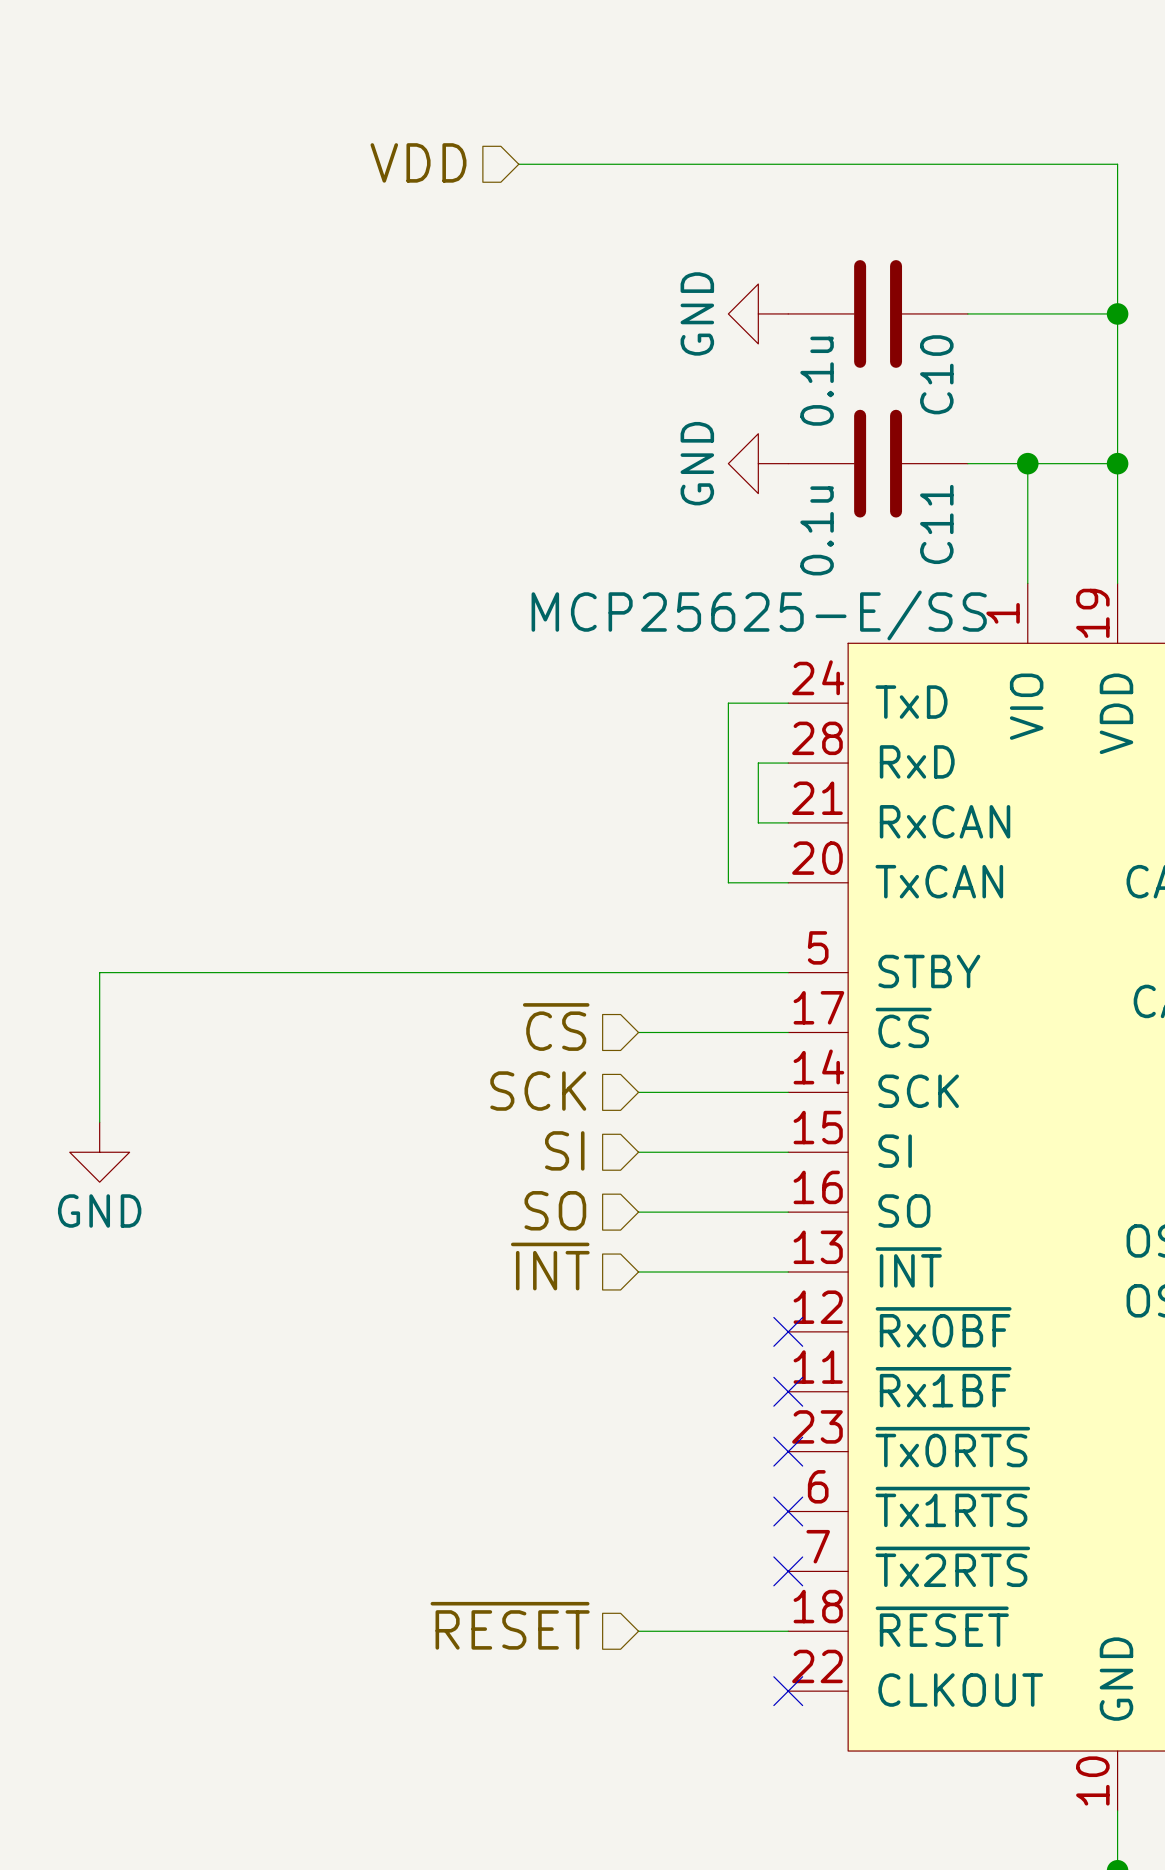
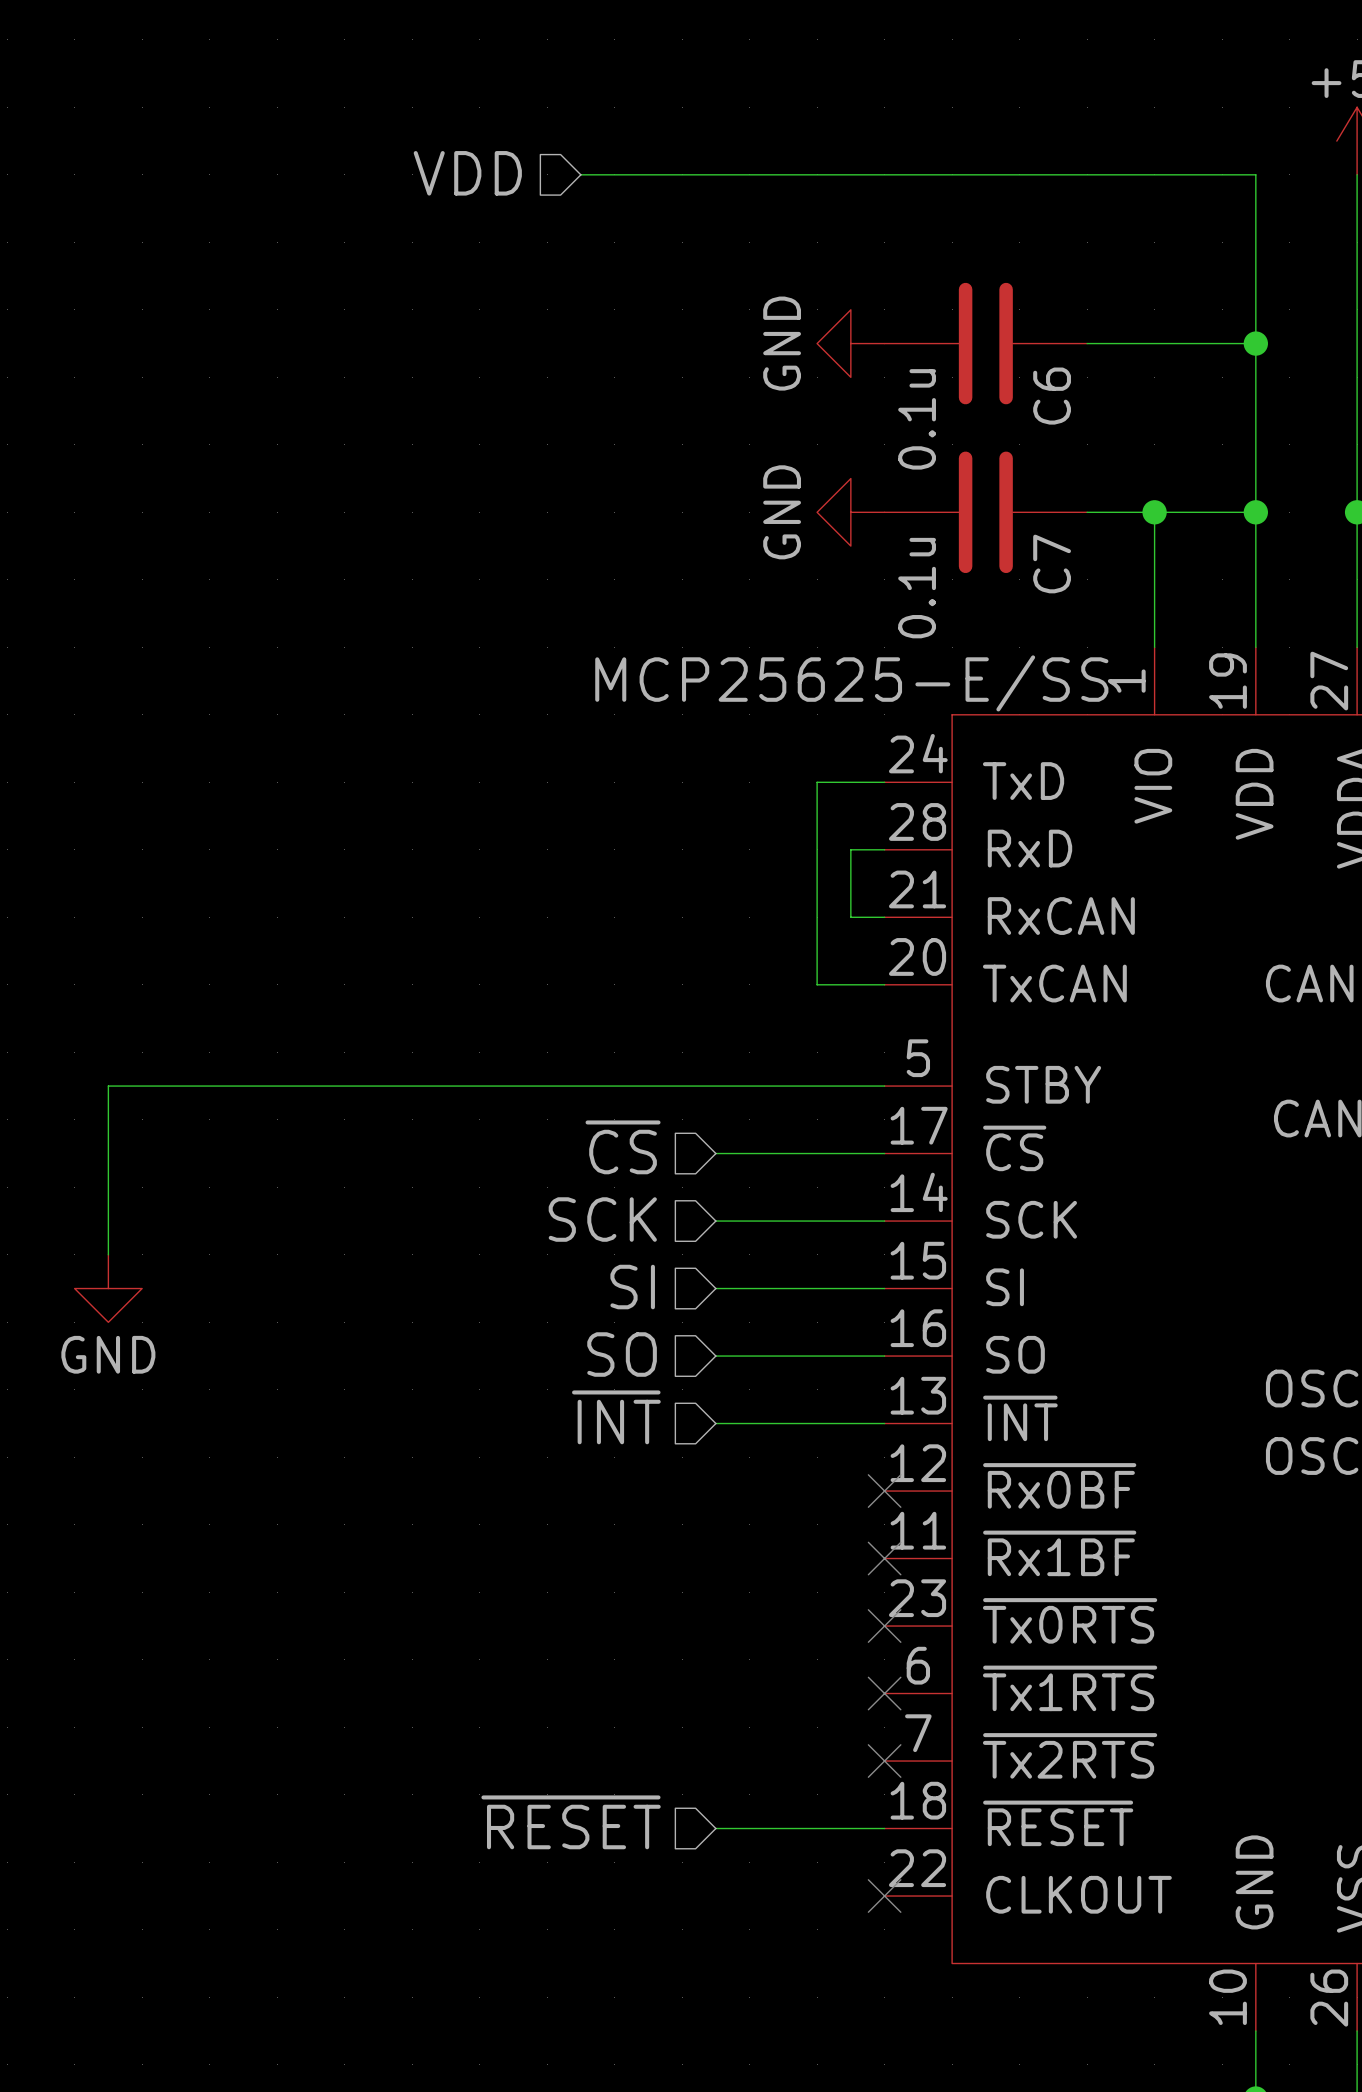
C10 name: C10 (936, 374) -> C6 (1052, 396)
C11 name: C11 (936, 524) -> C7 (1052, 563)

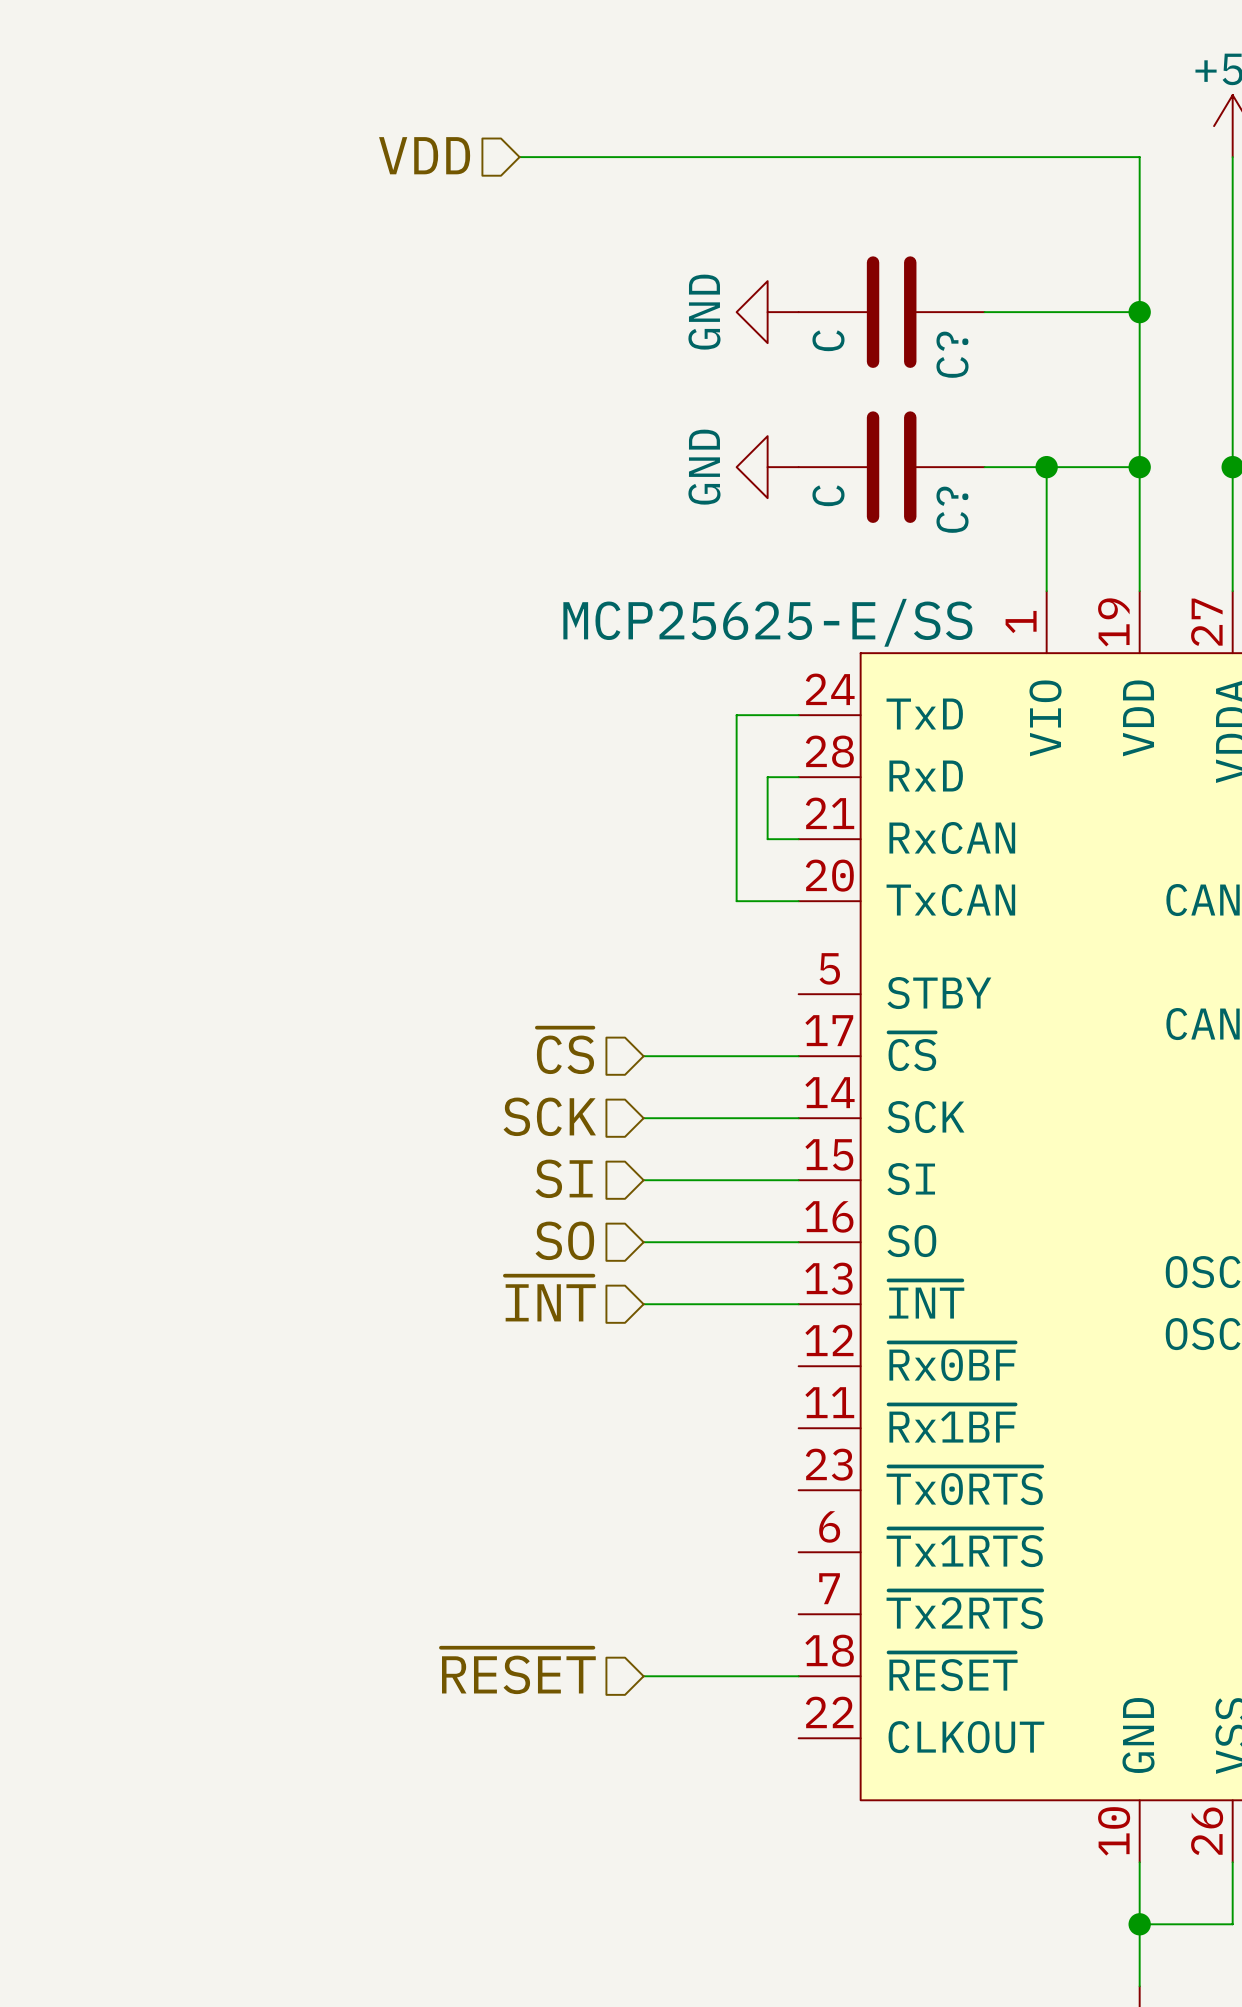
C6 name: C6 (1052, 396) -> C? (952, 354)
C6 value: 0.1u (917, 419) -> C (828, 340)
C7 name: C7 (1052, 563) -> C? (952, 509)
C7 value: 0.1u (917, 588) -> C (828, 495)
wire: (884, 1086) (108, 1086) (108, 1254) -> none
power symbol: GND (108, 1288) -> none
no-connect mark: (884, 1491) -> none
no-connect mark: (884, 1558) -> none
no-connect mark: (884, 1626) -> none
no-connect mark: (884, 1693) -> none
no-connect mark: (884, 1761) -> none
no-connect mark: (884, 1896) -> none

